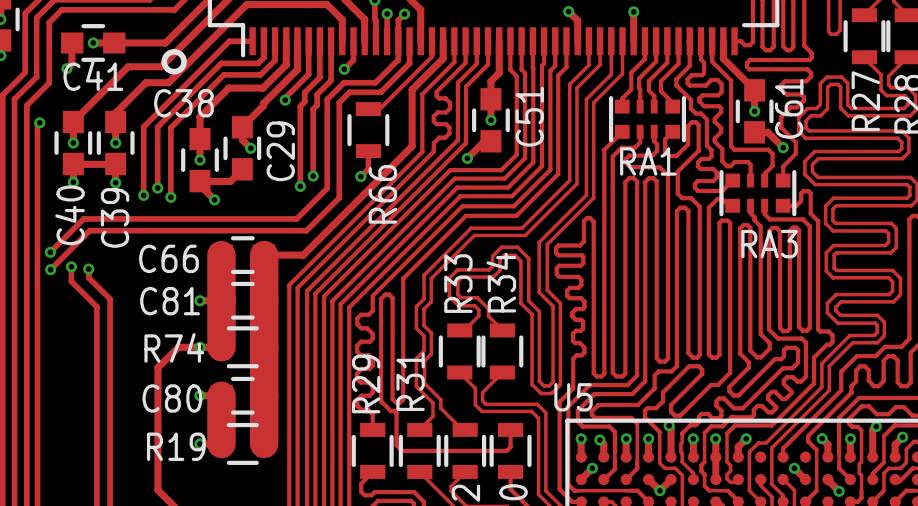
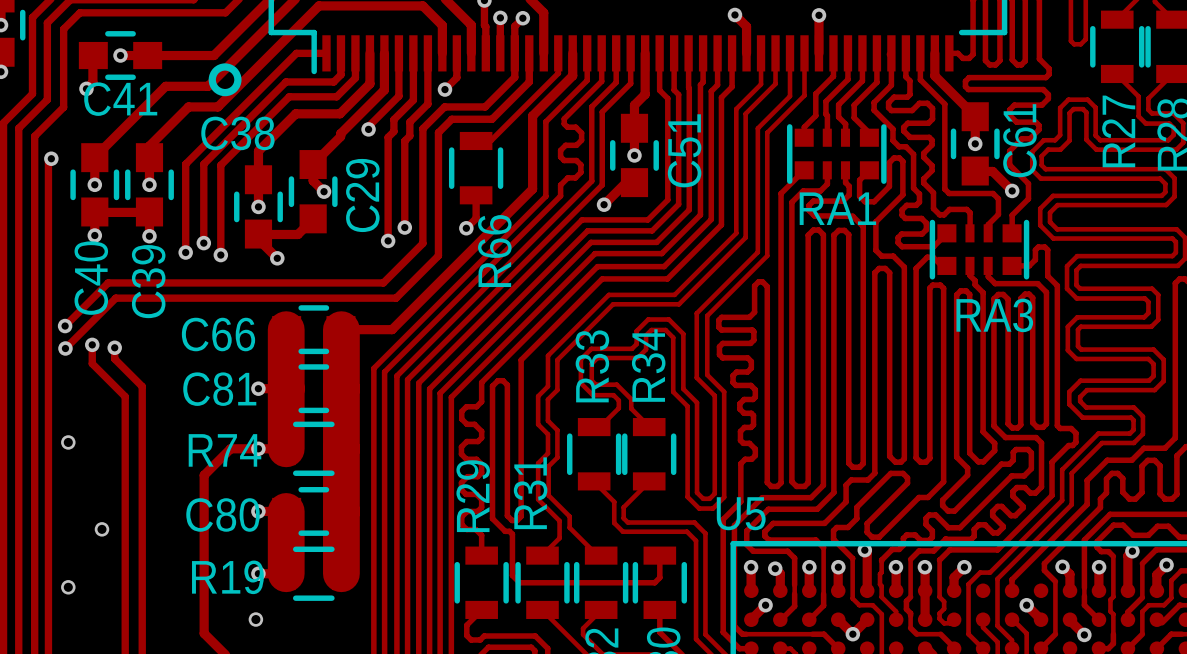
via: none -> (68, 442)
via: none -> (101, 529)
via: none -> (68, 587)
via: none -> (255, 619)

